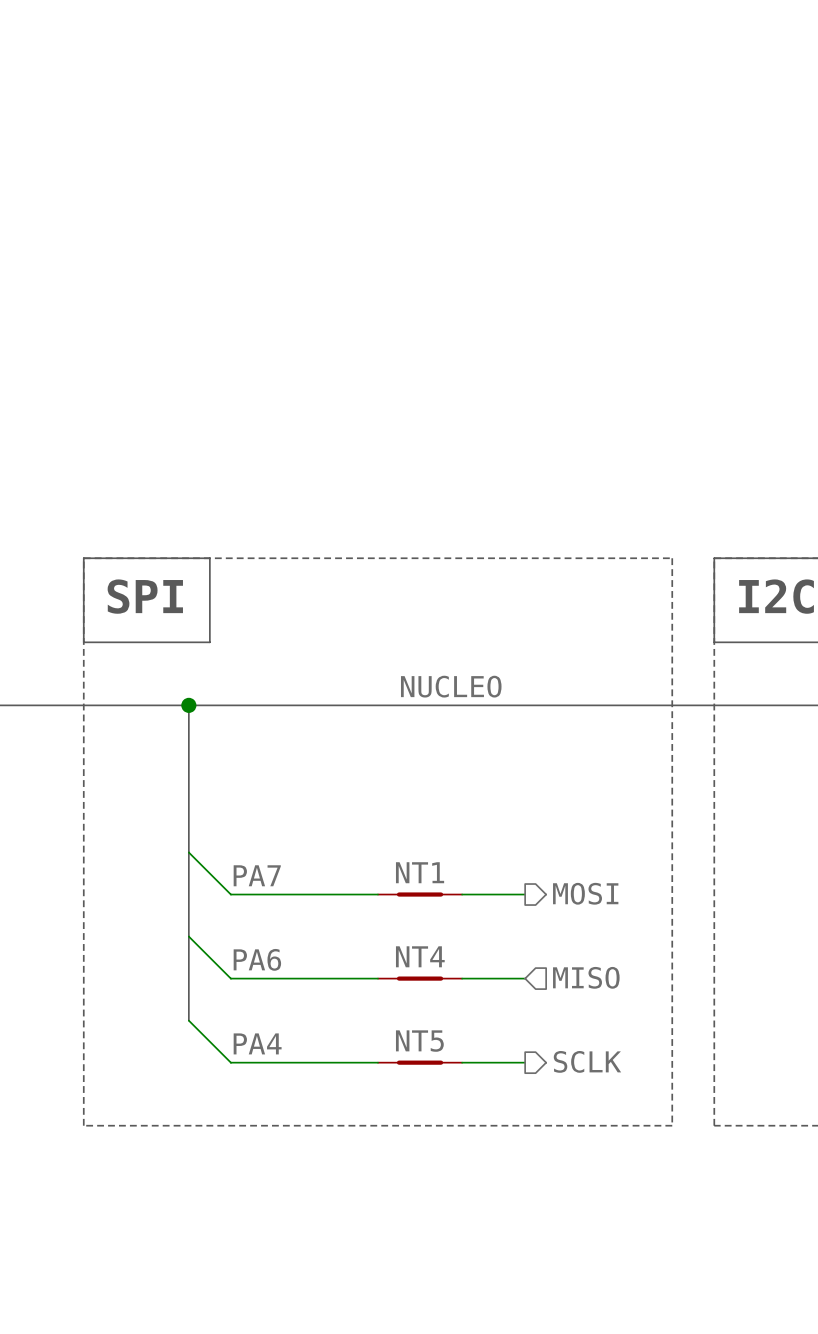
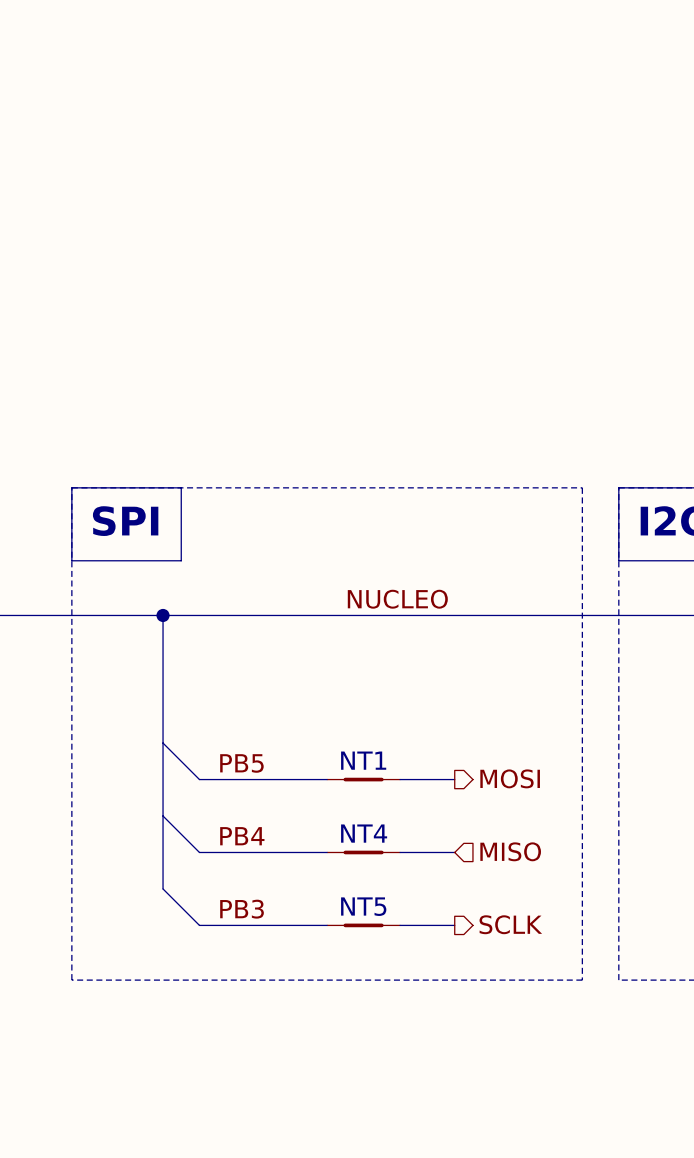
label: PA7 (257, 875) -> none
label: none -> PB5 (241, 763)
label: PA6 (257, 959) -> none
label: none -> PB4 (242, 836)
label: PA4 (257, 1043) -> none
label: none -> PB3 (242, 909)

